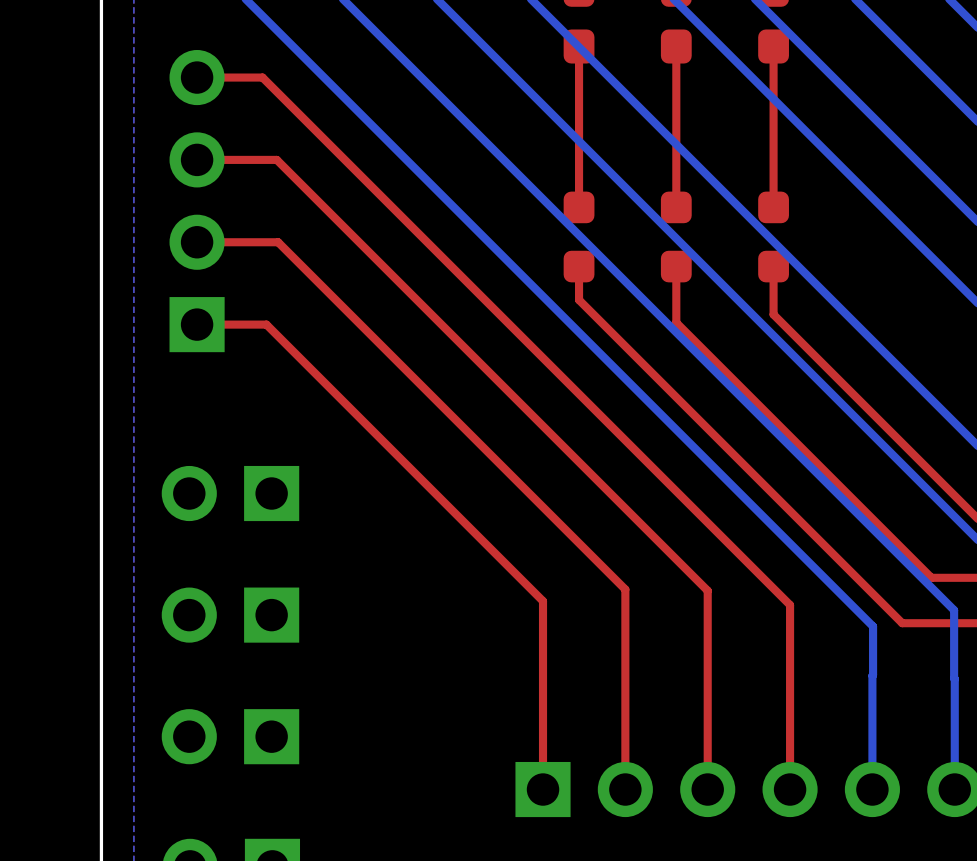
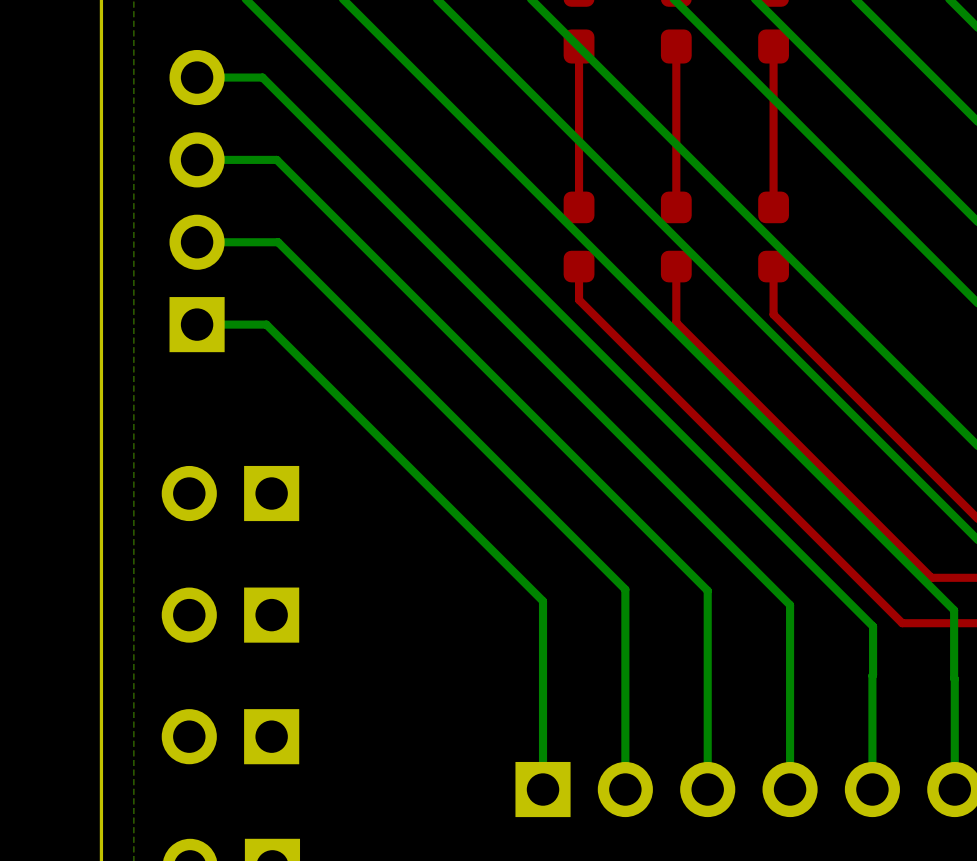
top track: (197, 77) (262, 77) (790, 605) (790, 789) -> none
bottom track: none -> (197, 77) (262, 77) (790, 605) (790, 789)
top track: (197, 159) (276, 159) (707, 590) (707, 789) -> none
bottom track: none -> (197, 159) (276, 159) (707, 590) (707, 789)
top track: (197, 242) (278, 242) (625, 589) (625, 789) -> none
bottom track: none -> (197, 242) (278, 242) (625, 589) (625, 789)
top track: (197, 324) (266, 324) (543, 601) (543, 789) -> none
bottom track: none -> (197, 324) (266, 324) (543, 601) (543, 789)

